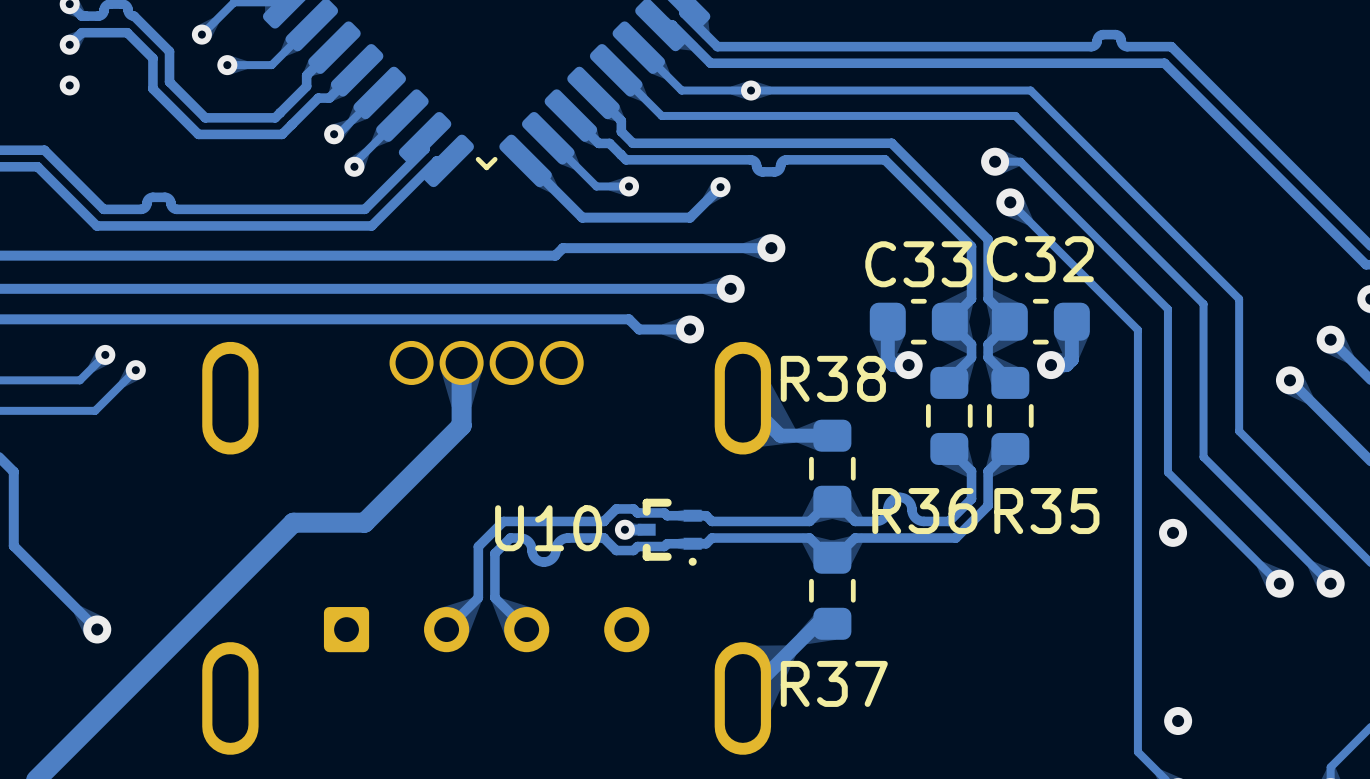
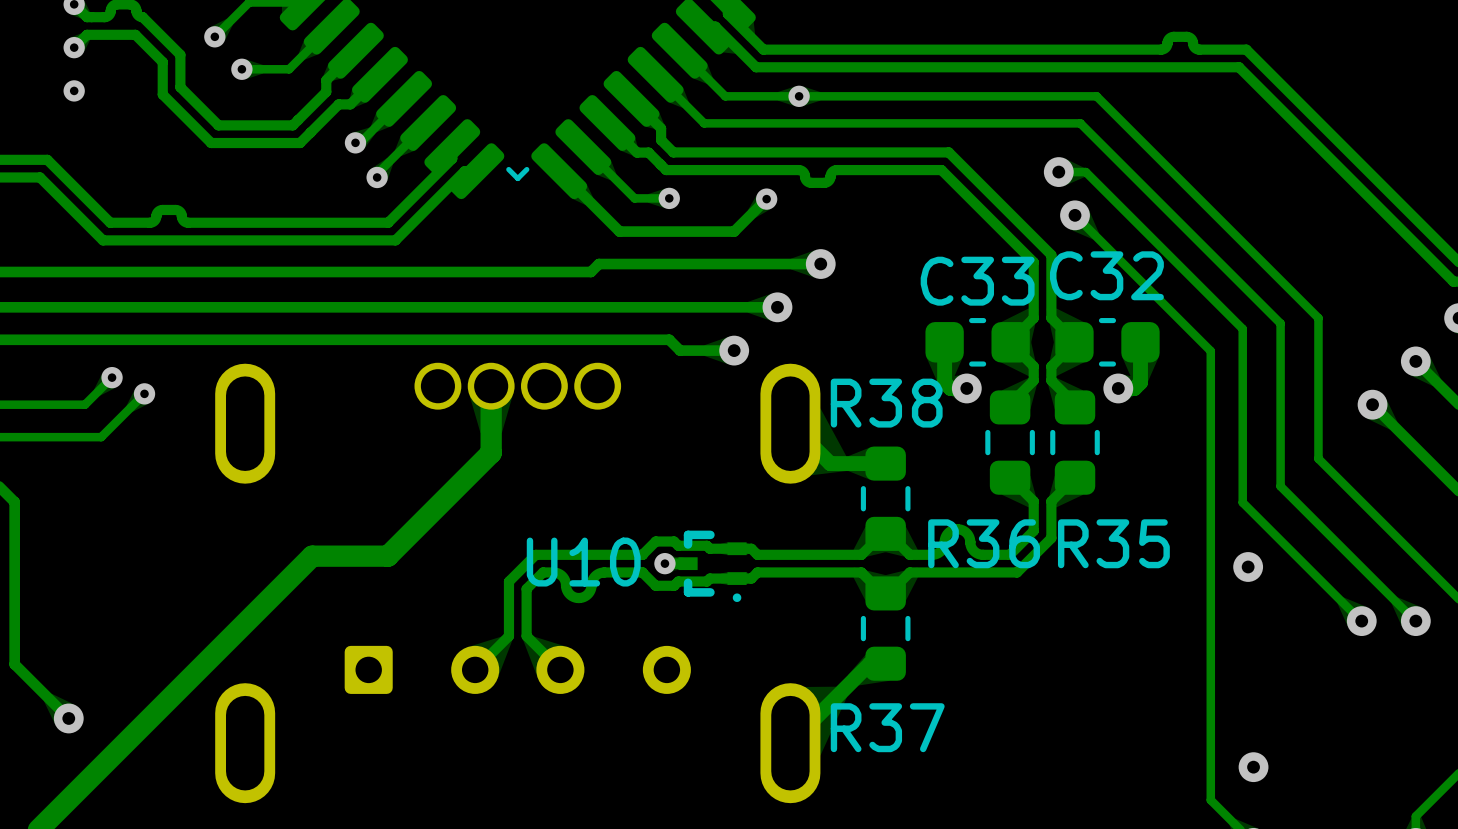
track: (13, 546) (97, 629) -> (14, 580) (14, 664) (68, 718)
via position: (97, 629) -> (68, 718)

